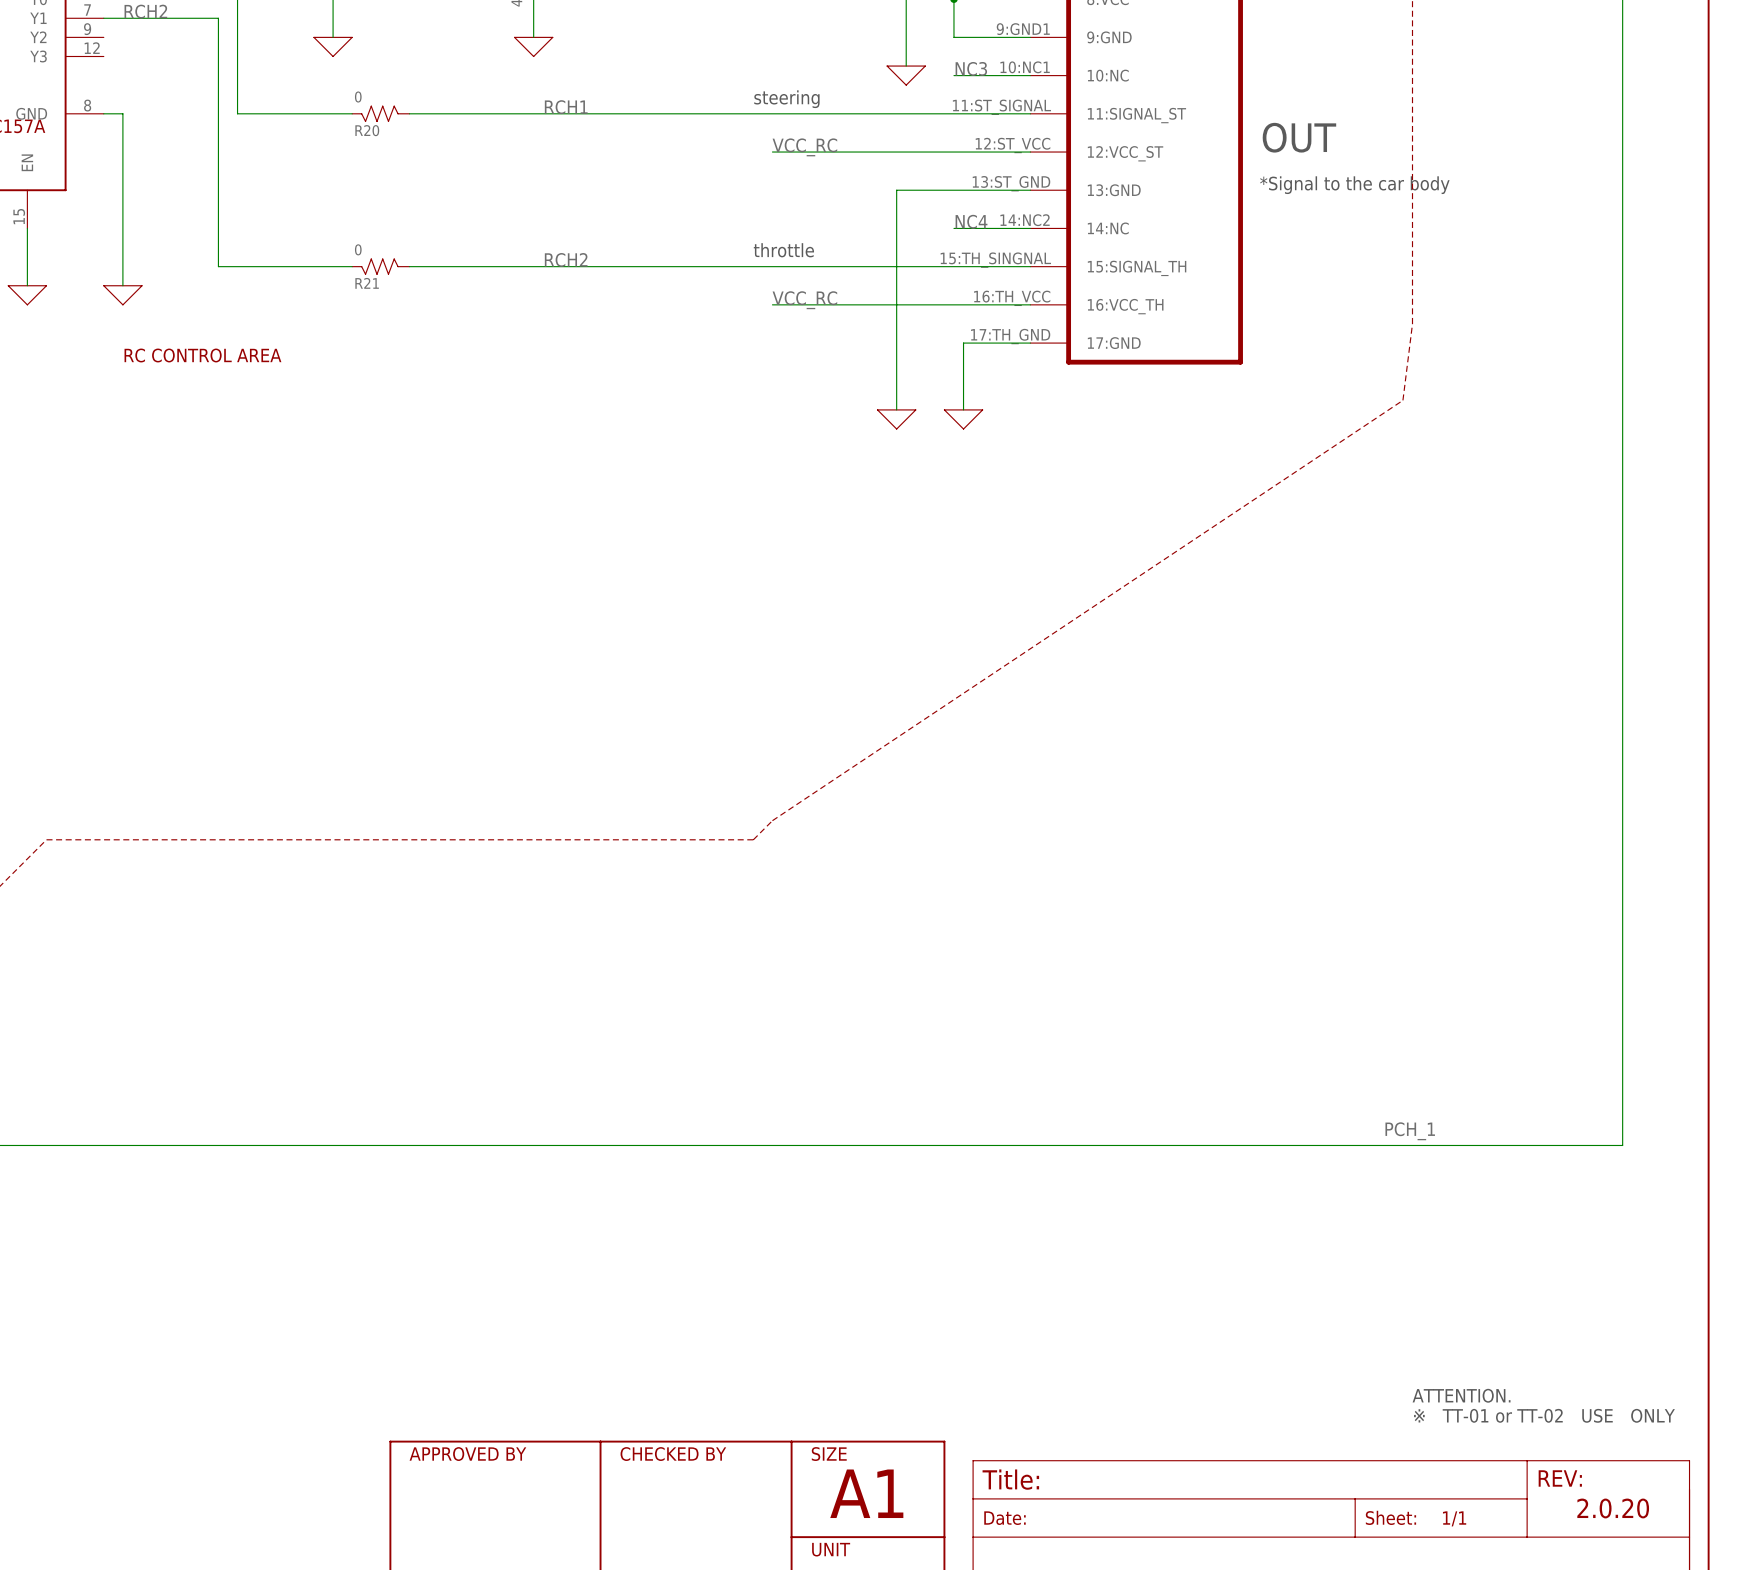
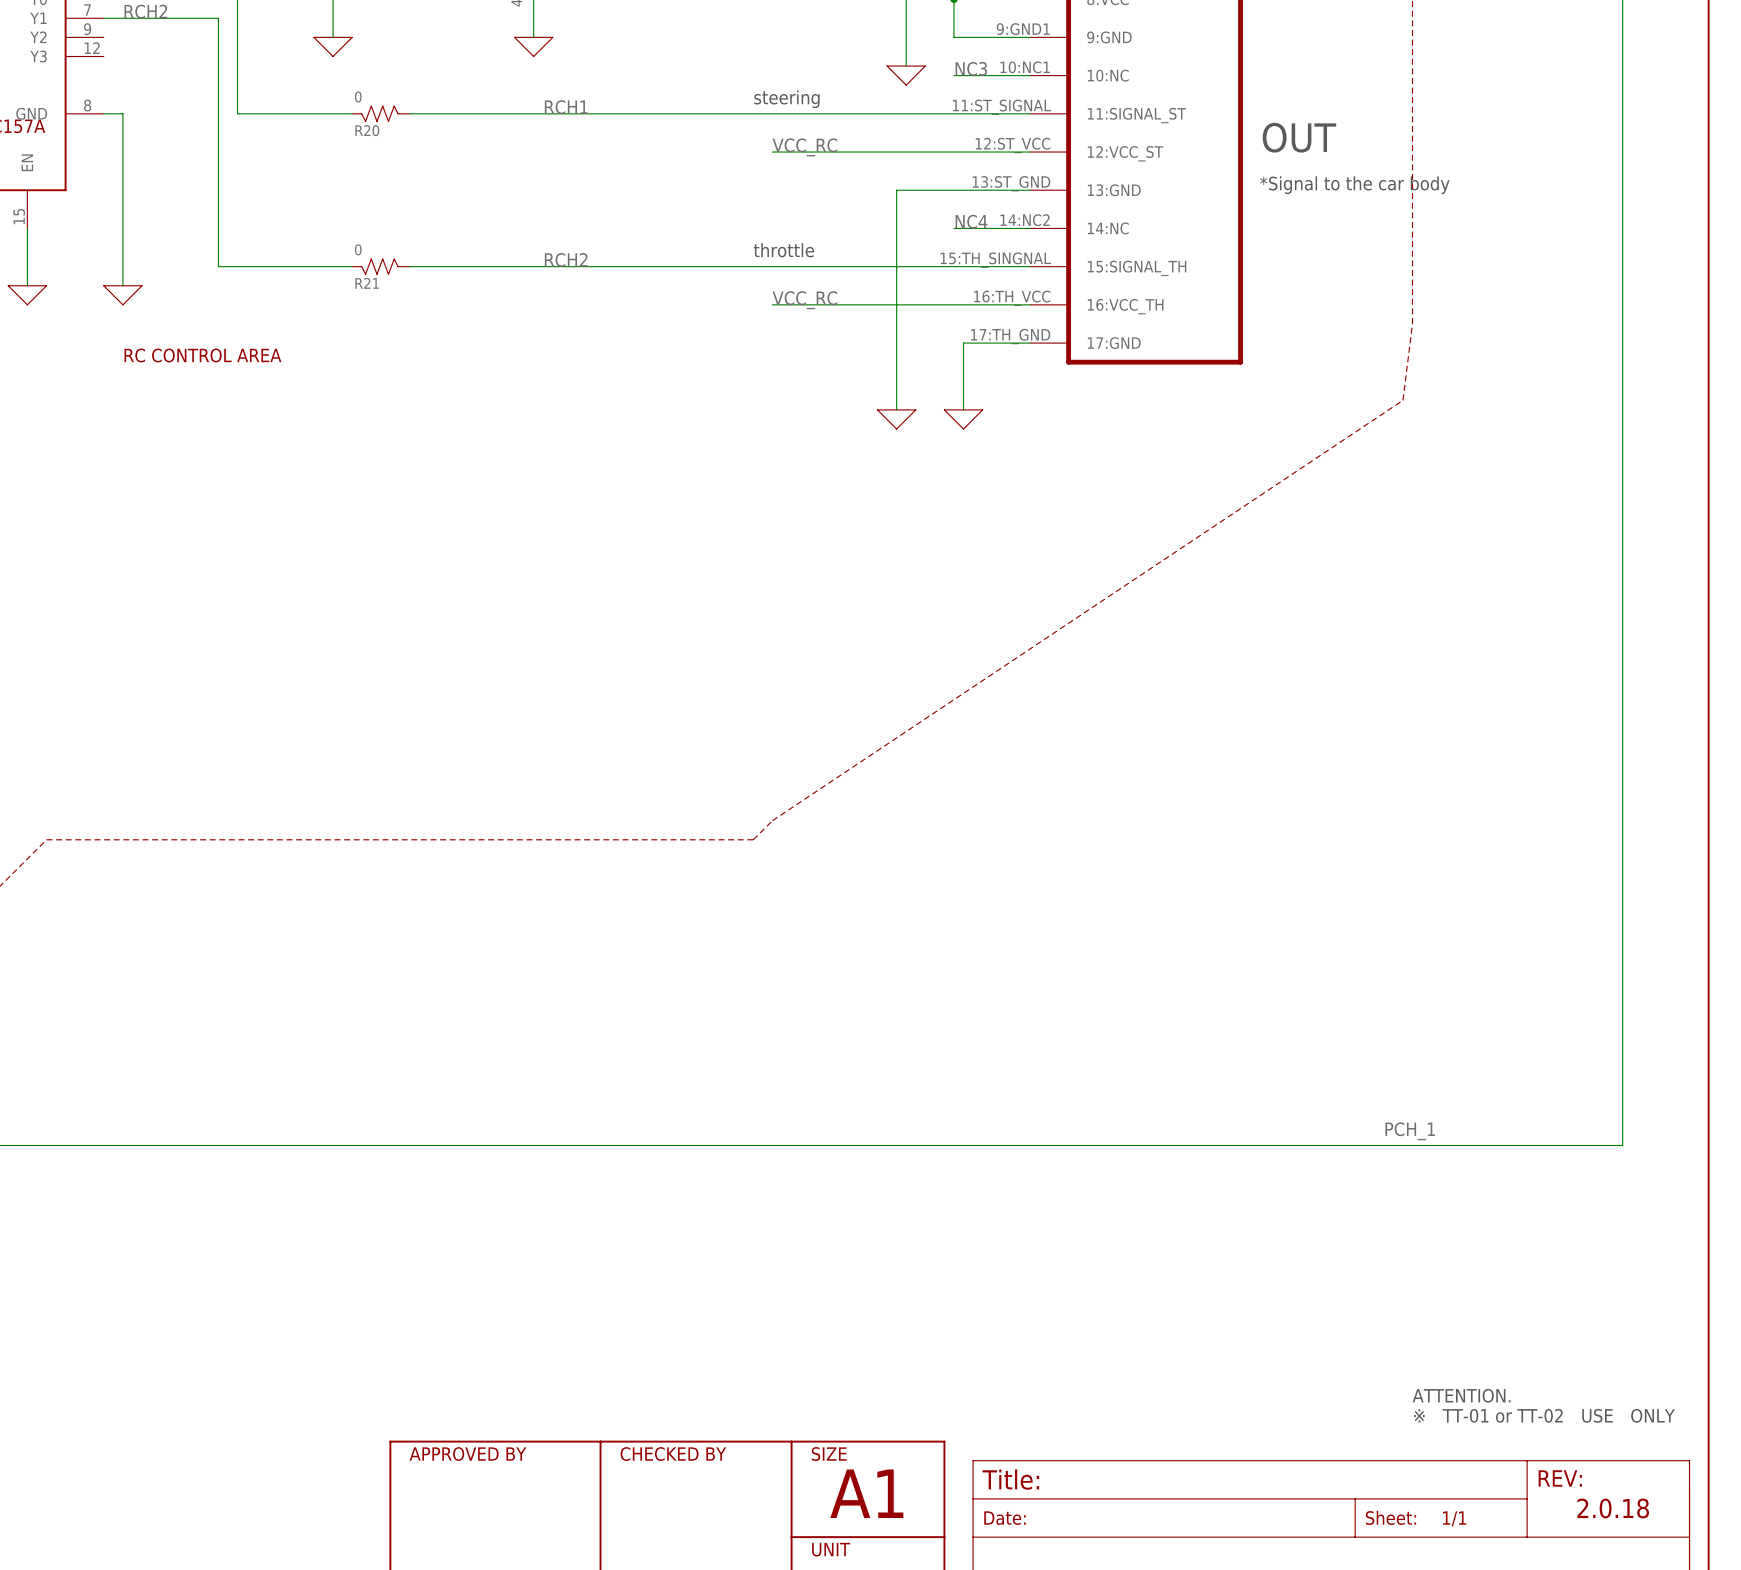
text: 2.0.20 (1613, 1508) -> 2.0.18 (1613, 1508)

